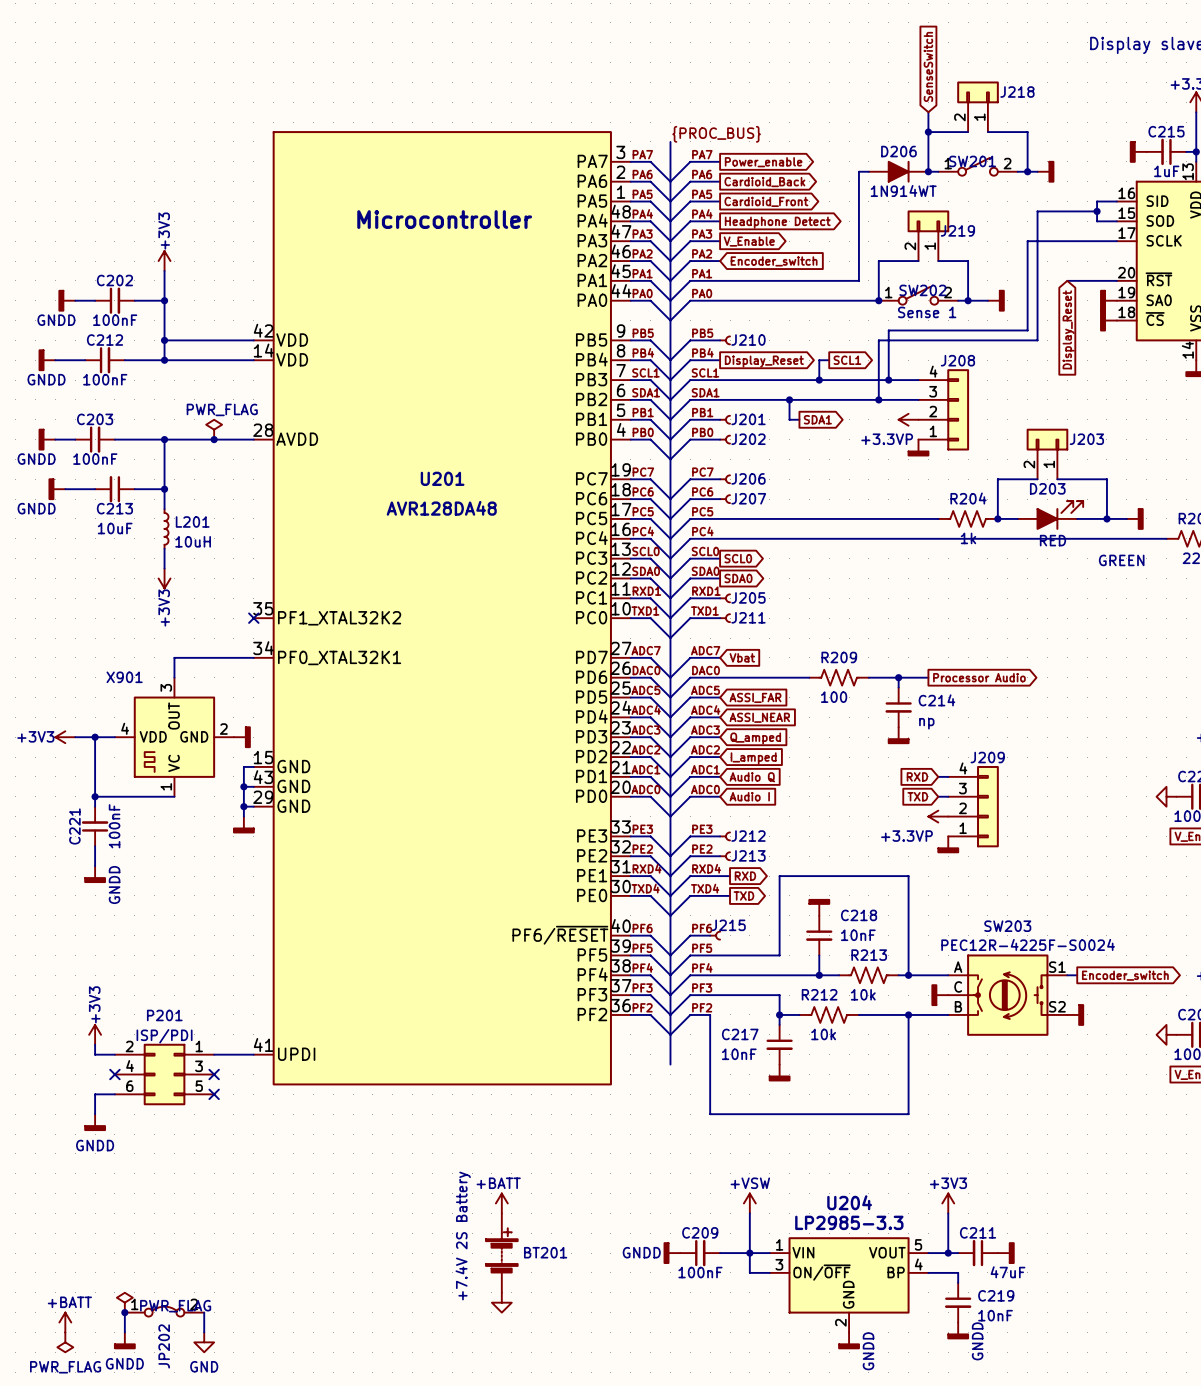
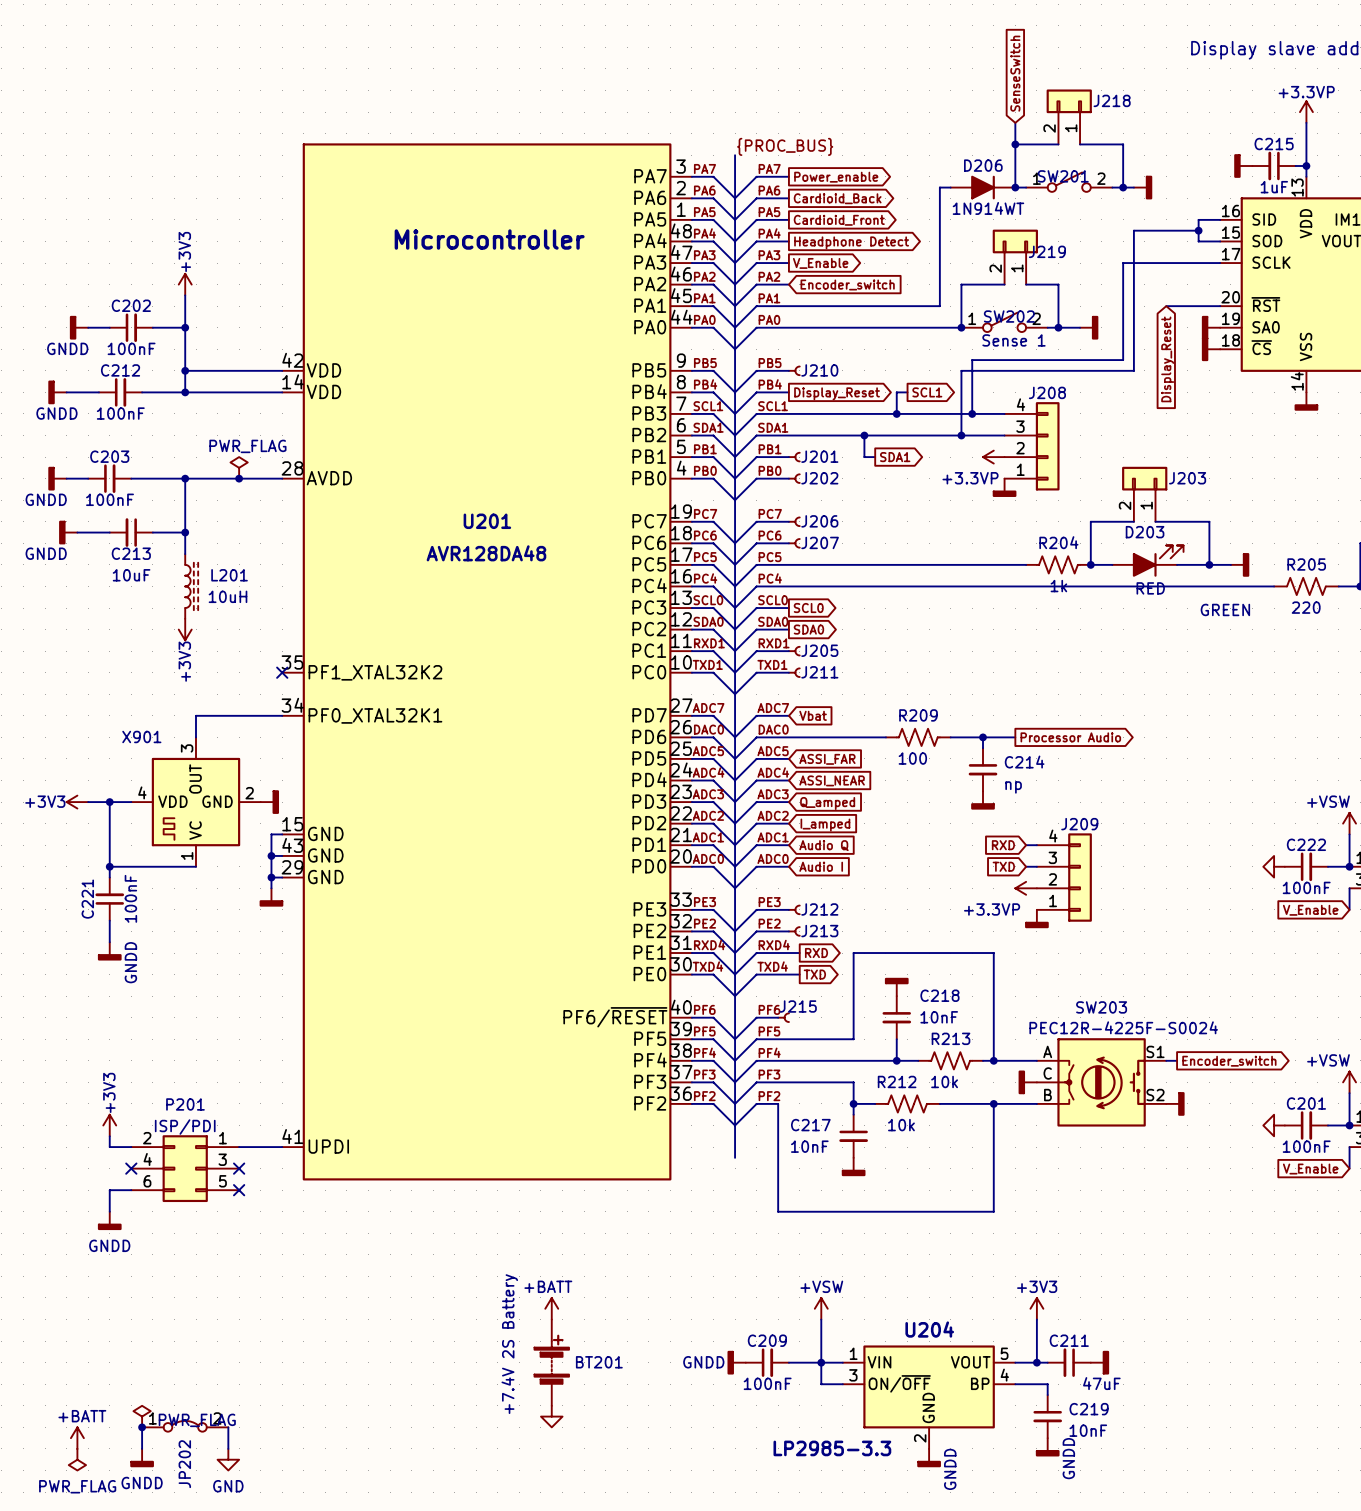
L201 symbol: [164, 509, 169, 549] -> [185, 554, 199, 619]
U204 name position: U204 (849, 1202) -> U204 (929, 1329)
U204 value position: LP2985-3.3 (849, 1222) -> LP2985-3.3 (832, 1448)

